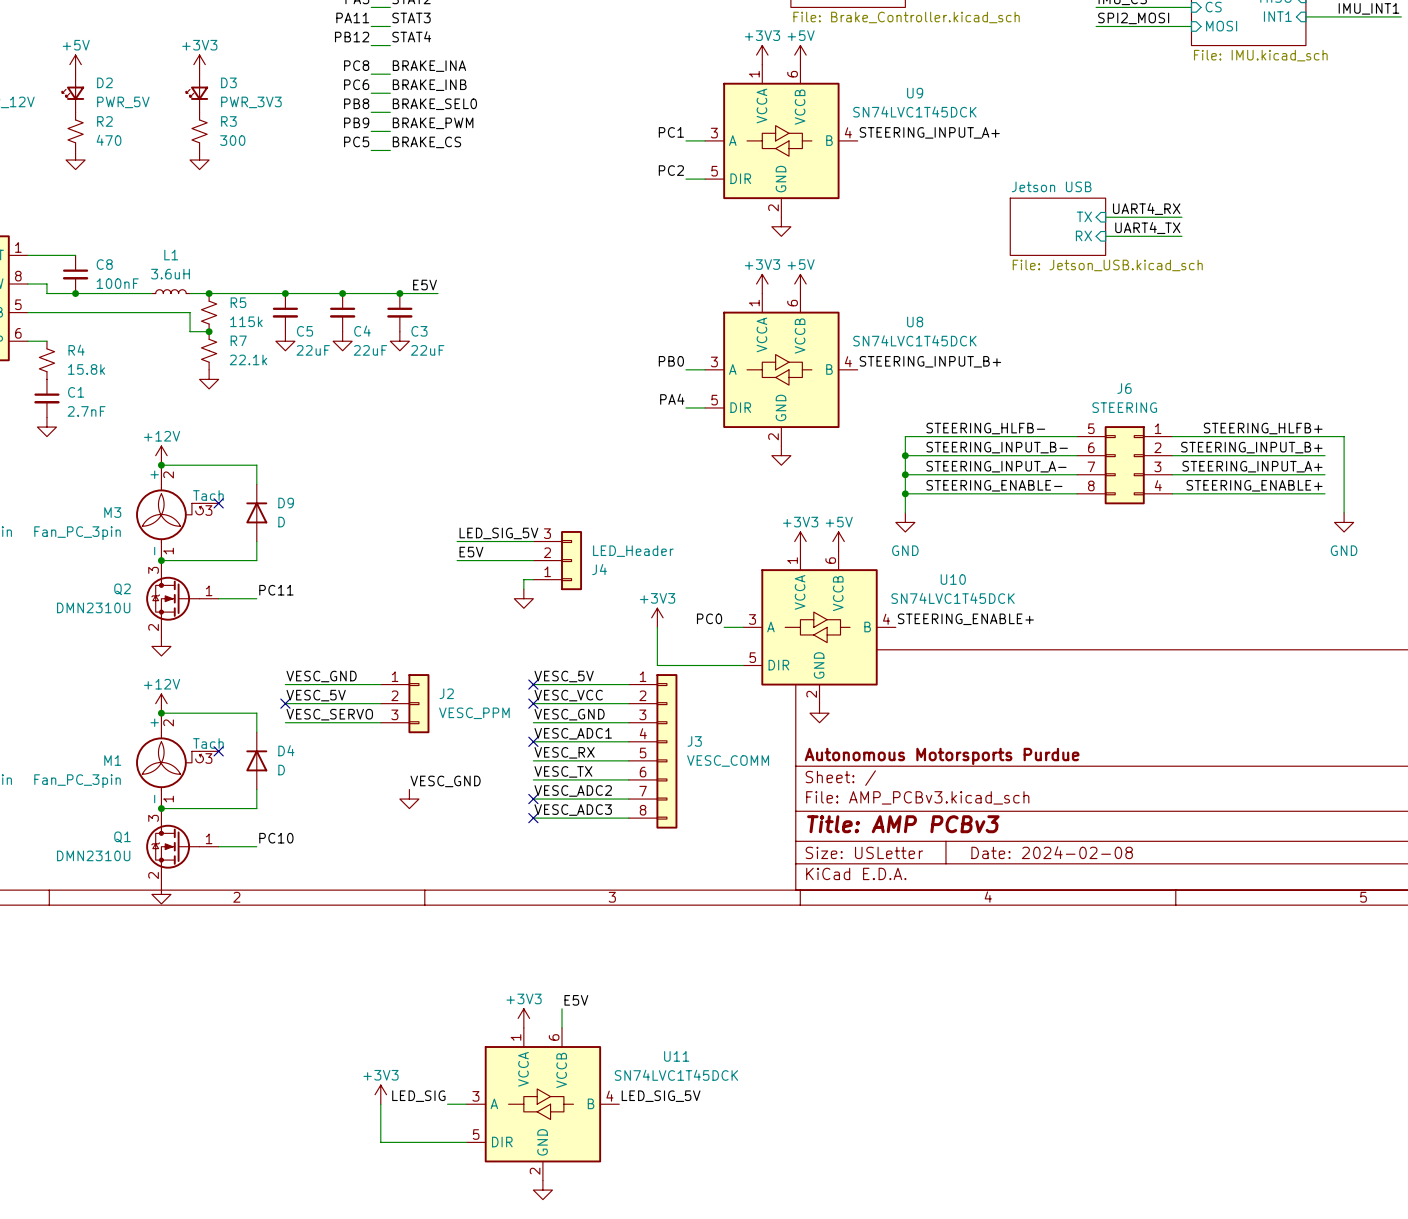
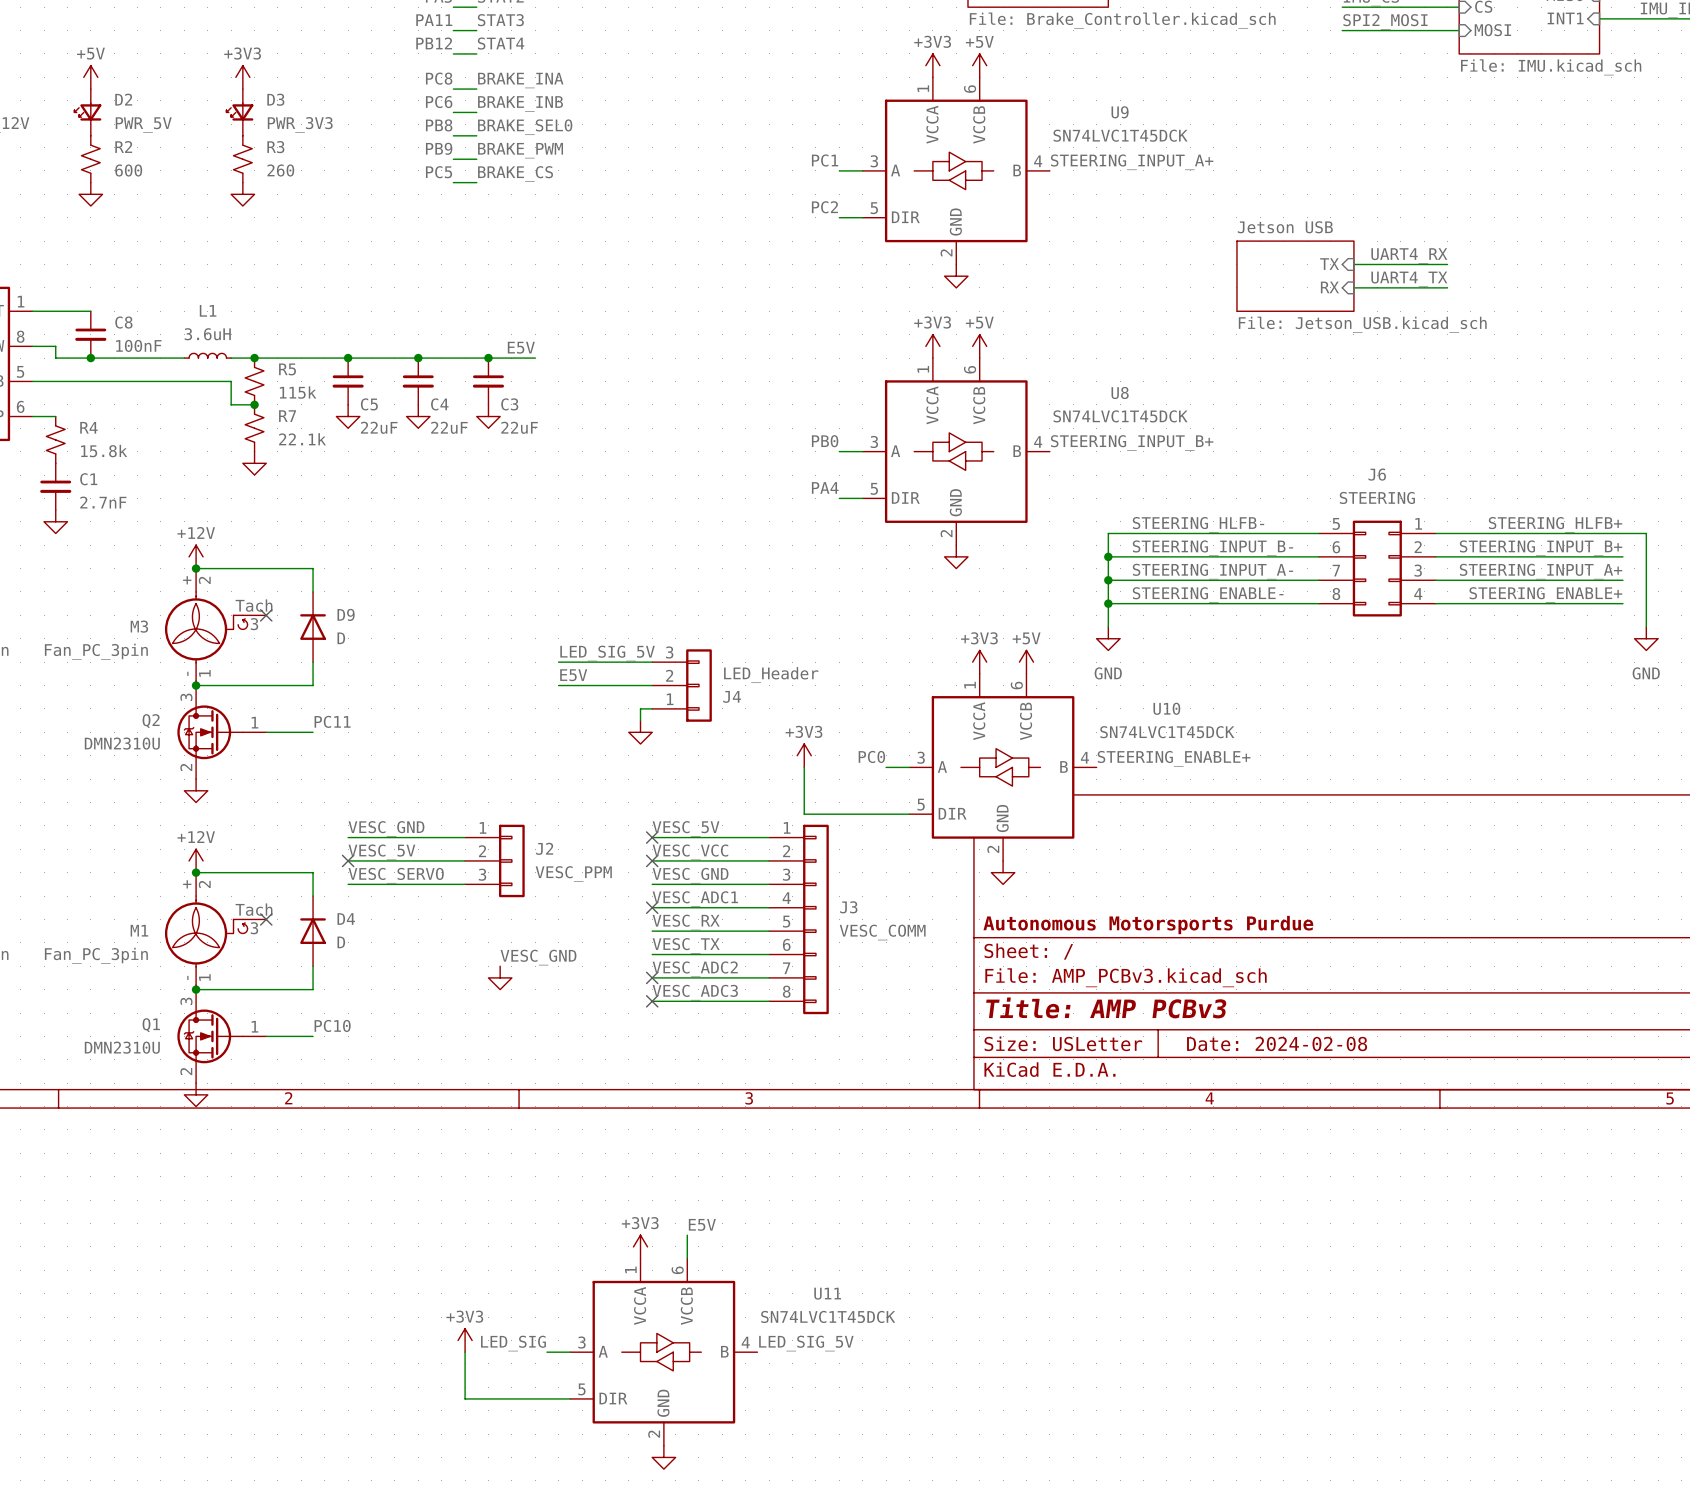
R2 value: 470 (109, 140) -> 600 (128, 170)
R3 value: 300 (232, 140) -> 260 (280, 170)

